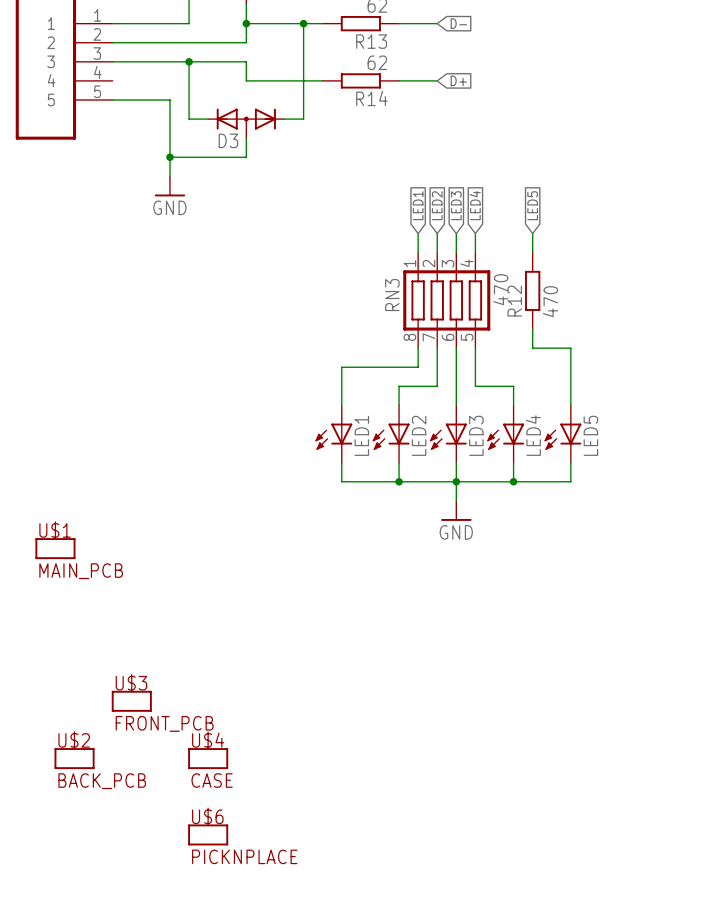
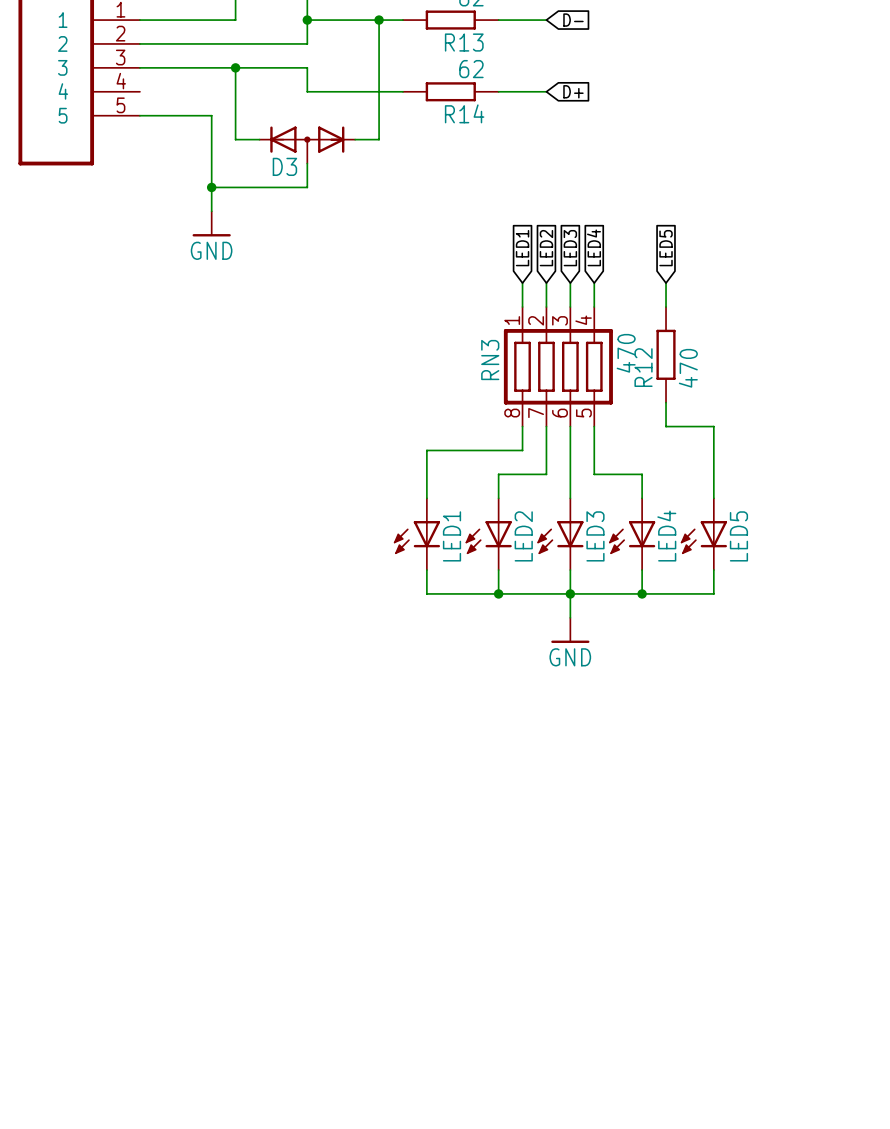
U$1: MAIN_PCB (55, 548) -> none
U$3: FRONT_PCB (131, 701) -> none
U$2: BACK_PCB (74, 758) -> none
U$4: CASE (208, 758) -> none
U$6: PICKNPLACE (208, 834) -> none

